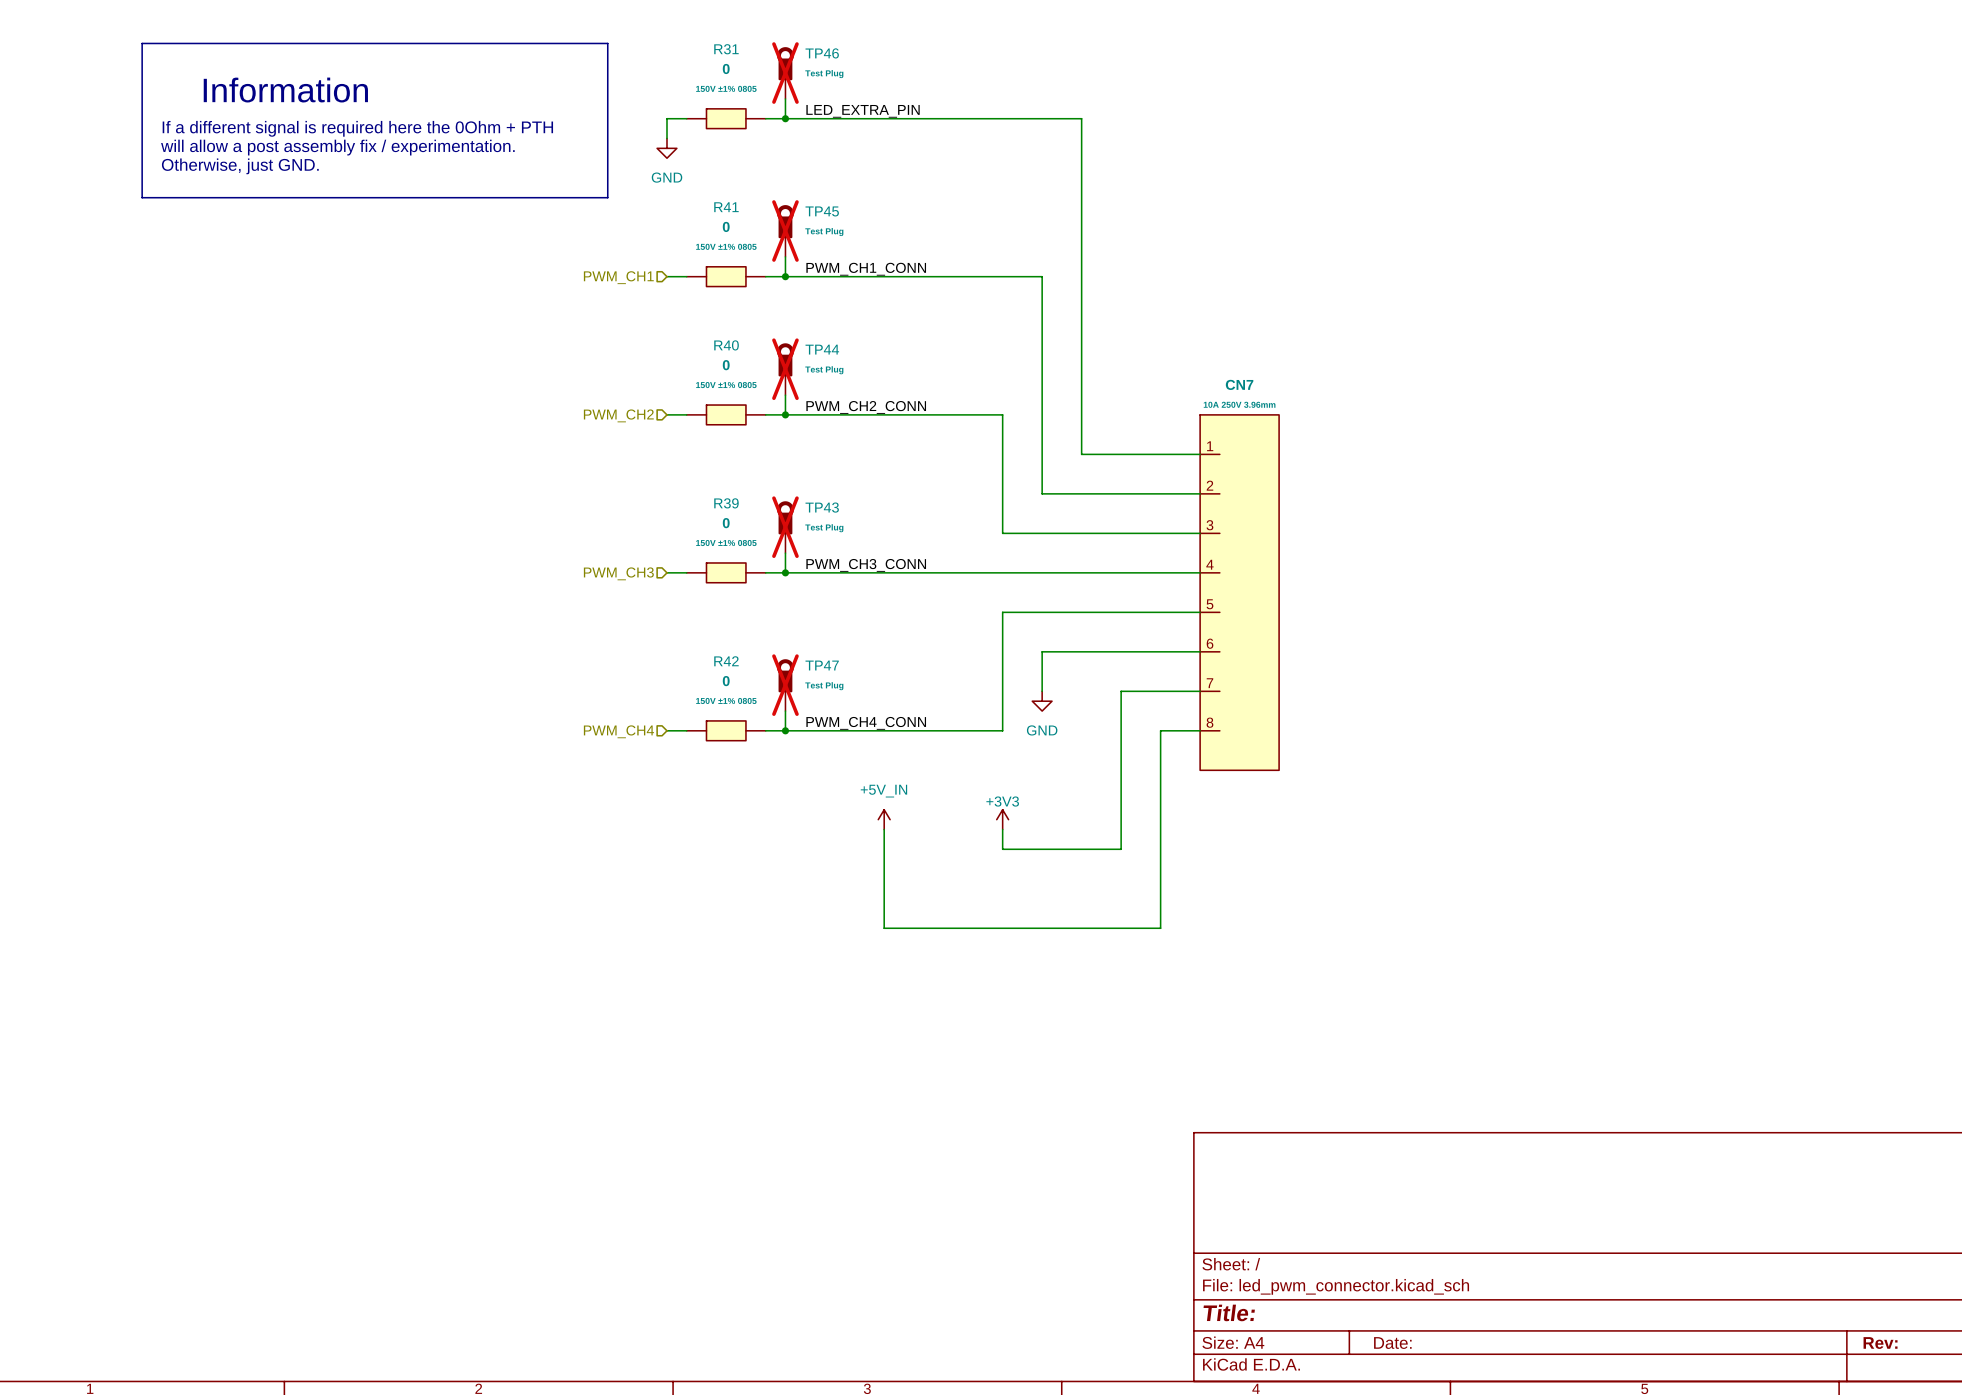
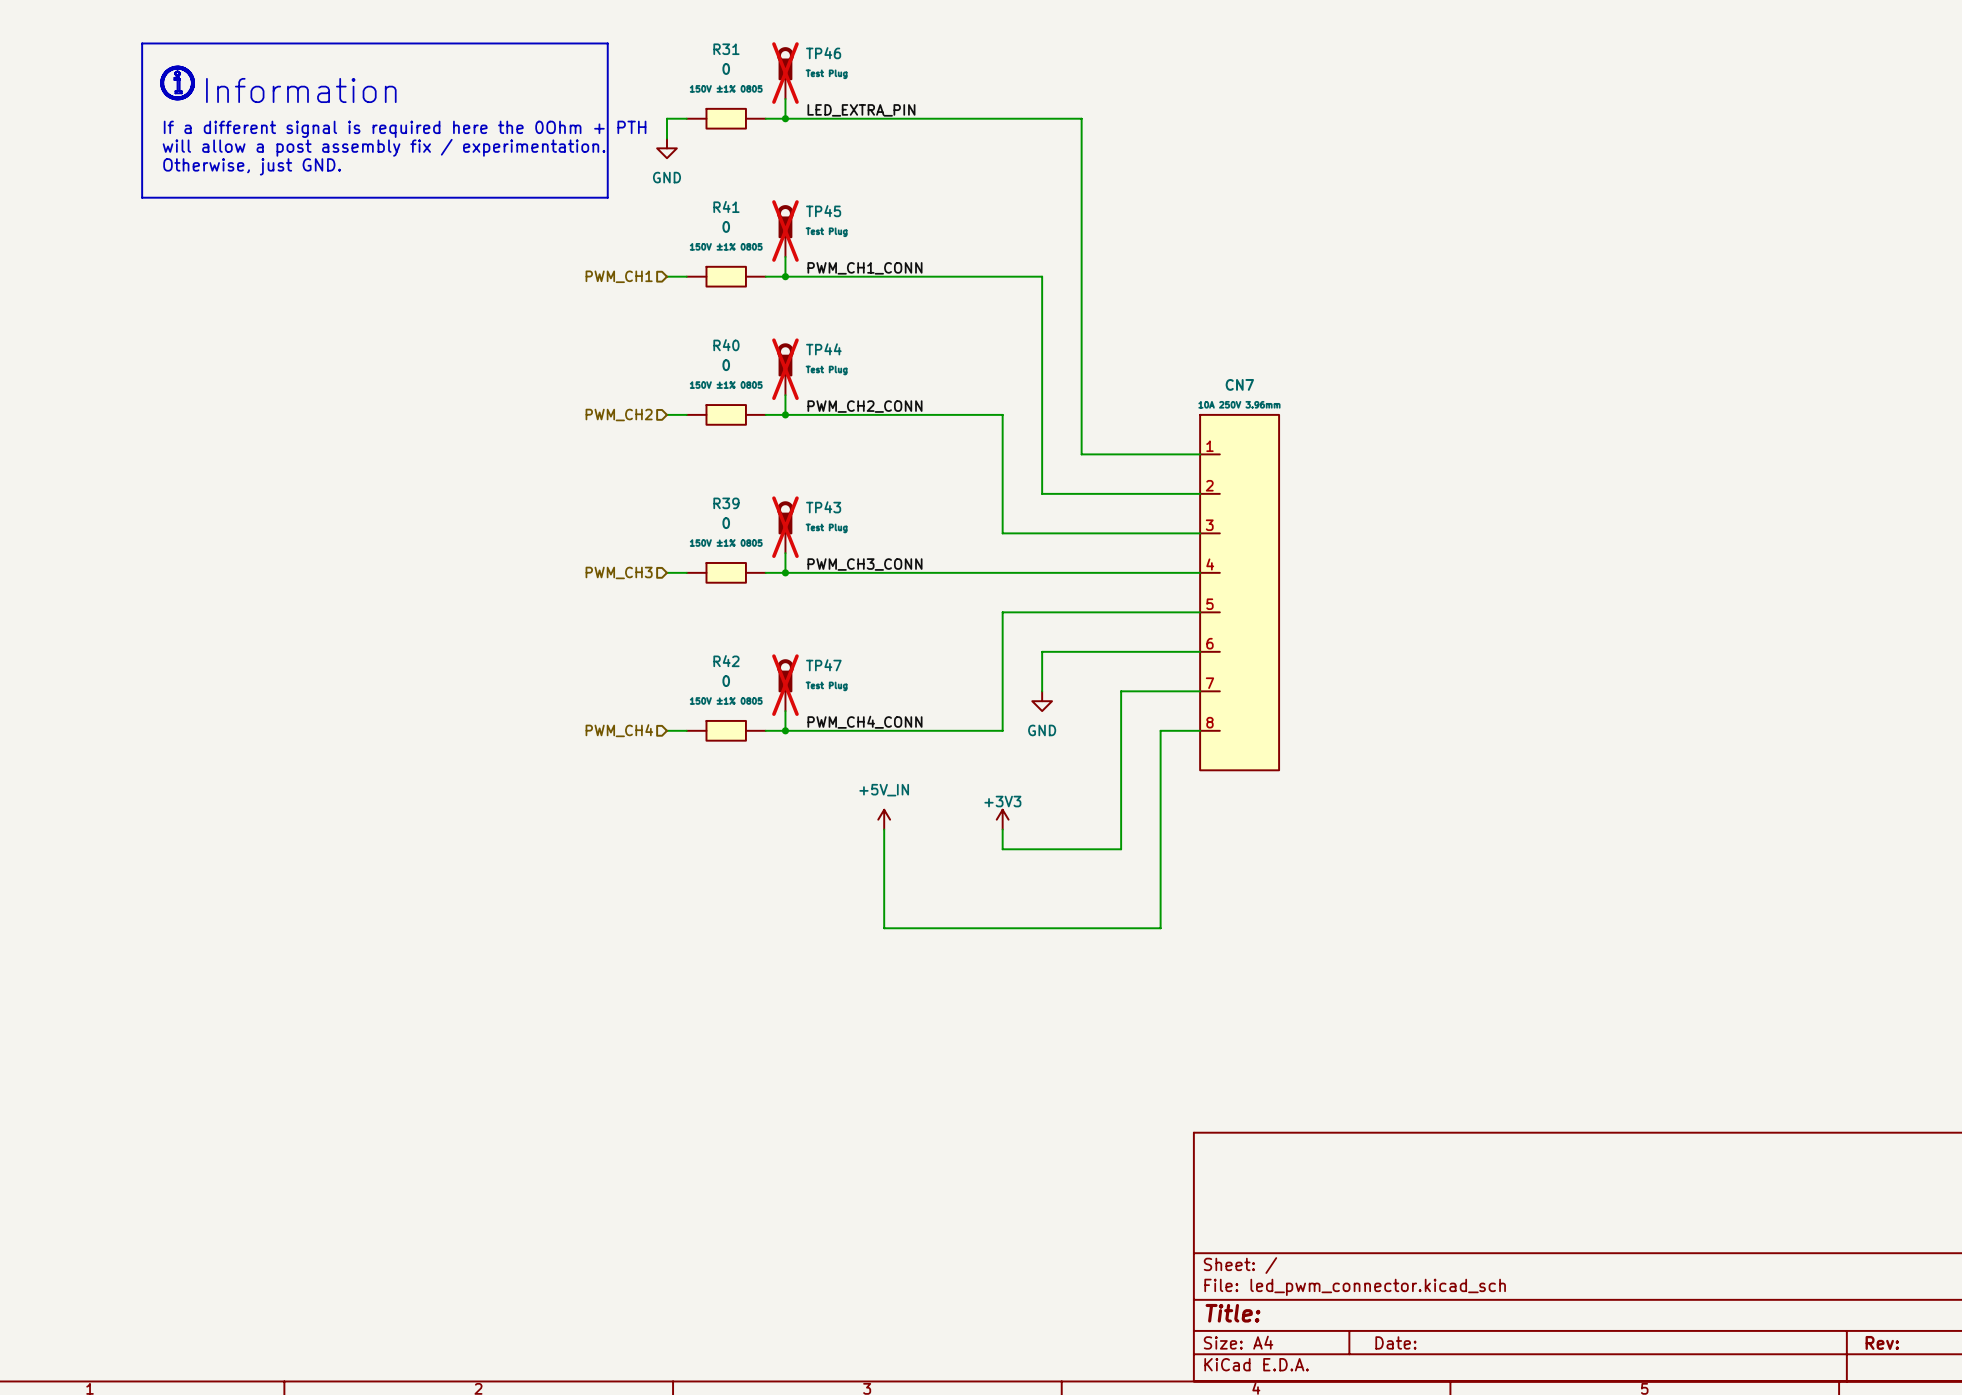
line: none -> (177, 66) (165, 71) (161, 82) (165, 94) (177, 99) (189, 94) (194, 83) (189, 71) (177, 66)
line: none -> (177, 77) (174, 77) (174, 79) (177, 79) (177, 91) (175, 93) (181, 93) (179, 91) (179, 79)
line: none -> (163, 83) (167, 93) (178, 97) (188, 92) (191, 82) (187, 72) (176, 68) (167, 72) (163, 83)

